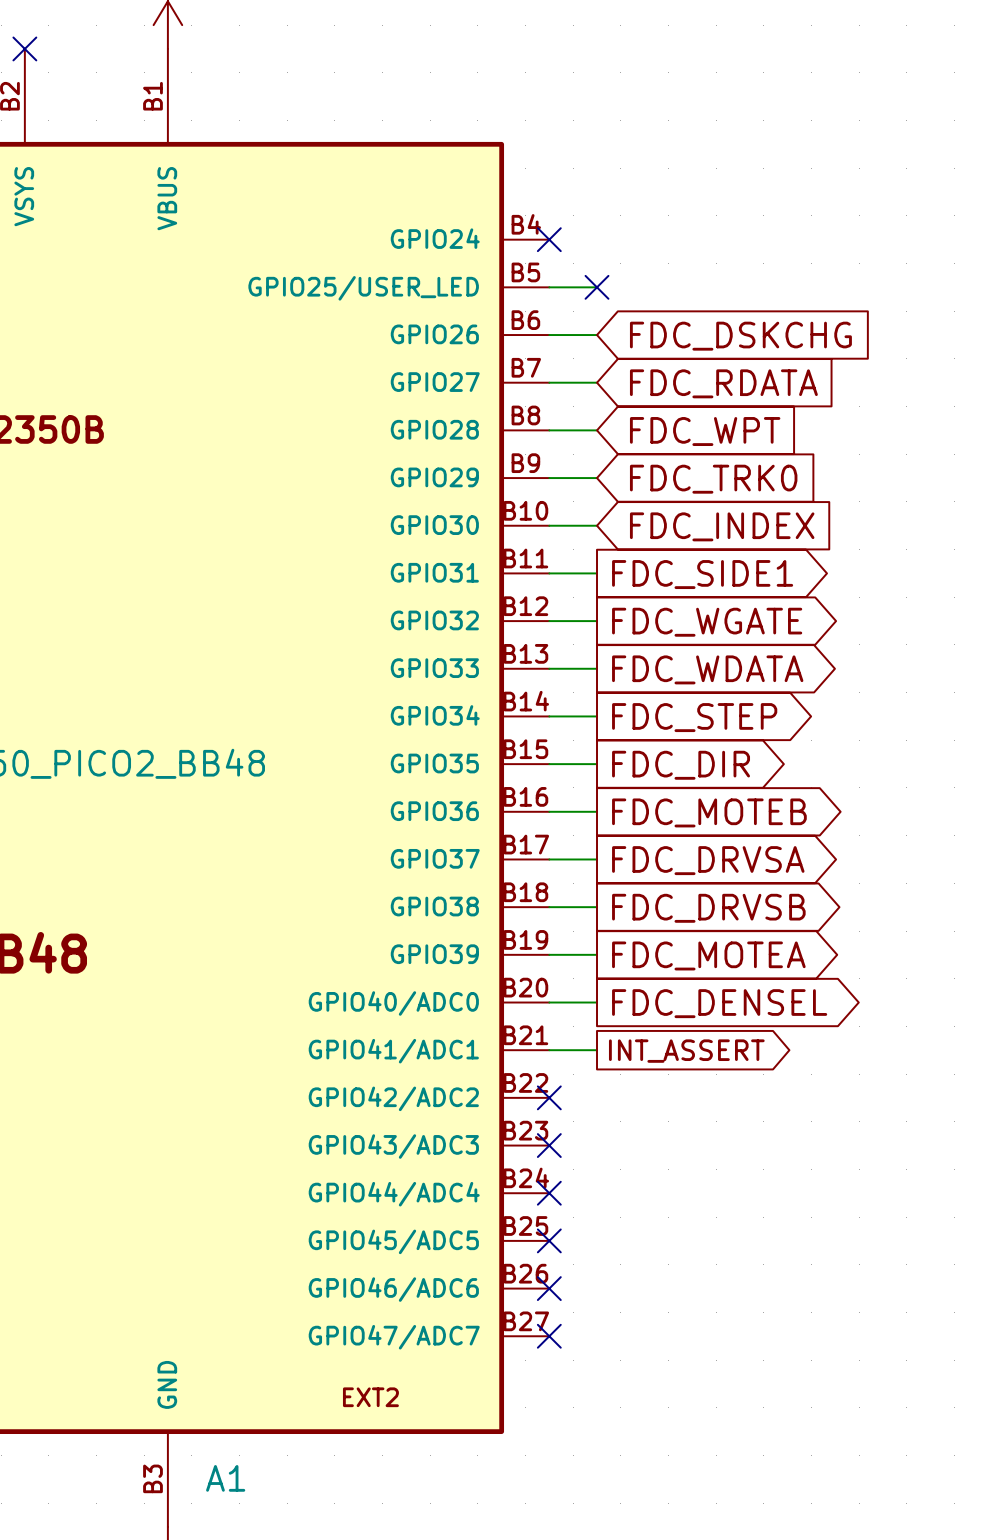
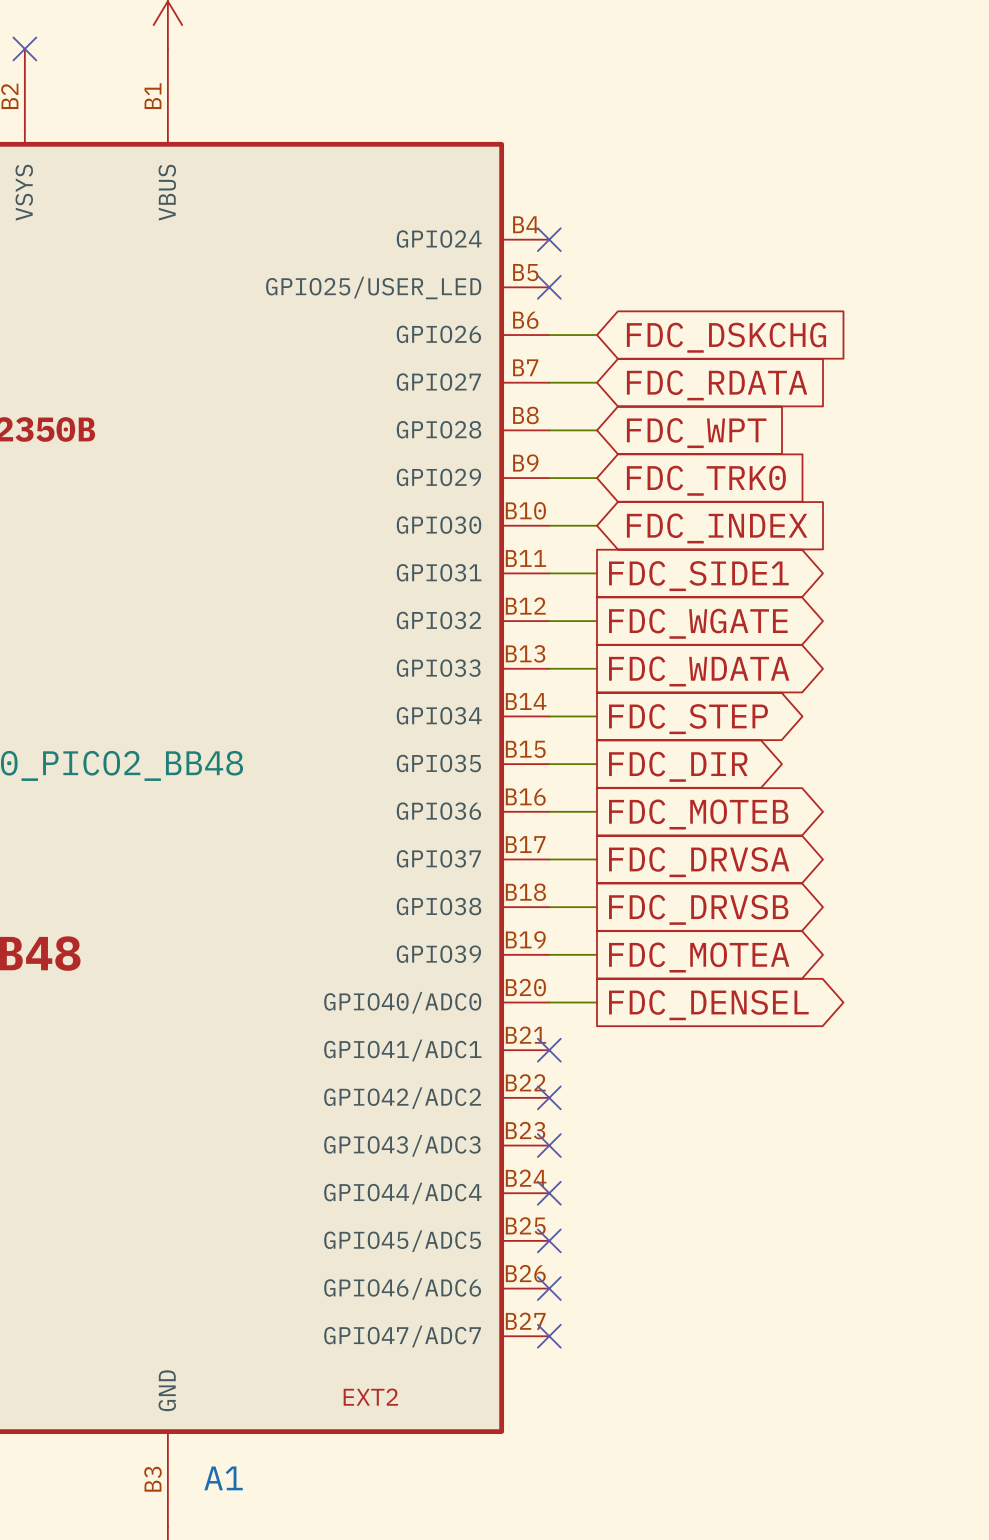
wire: (549, 287) (597, 287) -> none
no-connect mark position: (597, 287) -> (549, 287)
wire: (549, 1050) (597, 1050) -> none
no-connect mark: none -> (549, 1050)
global label: INT_ASSERT (686, 1051) -> none

